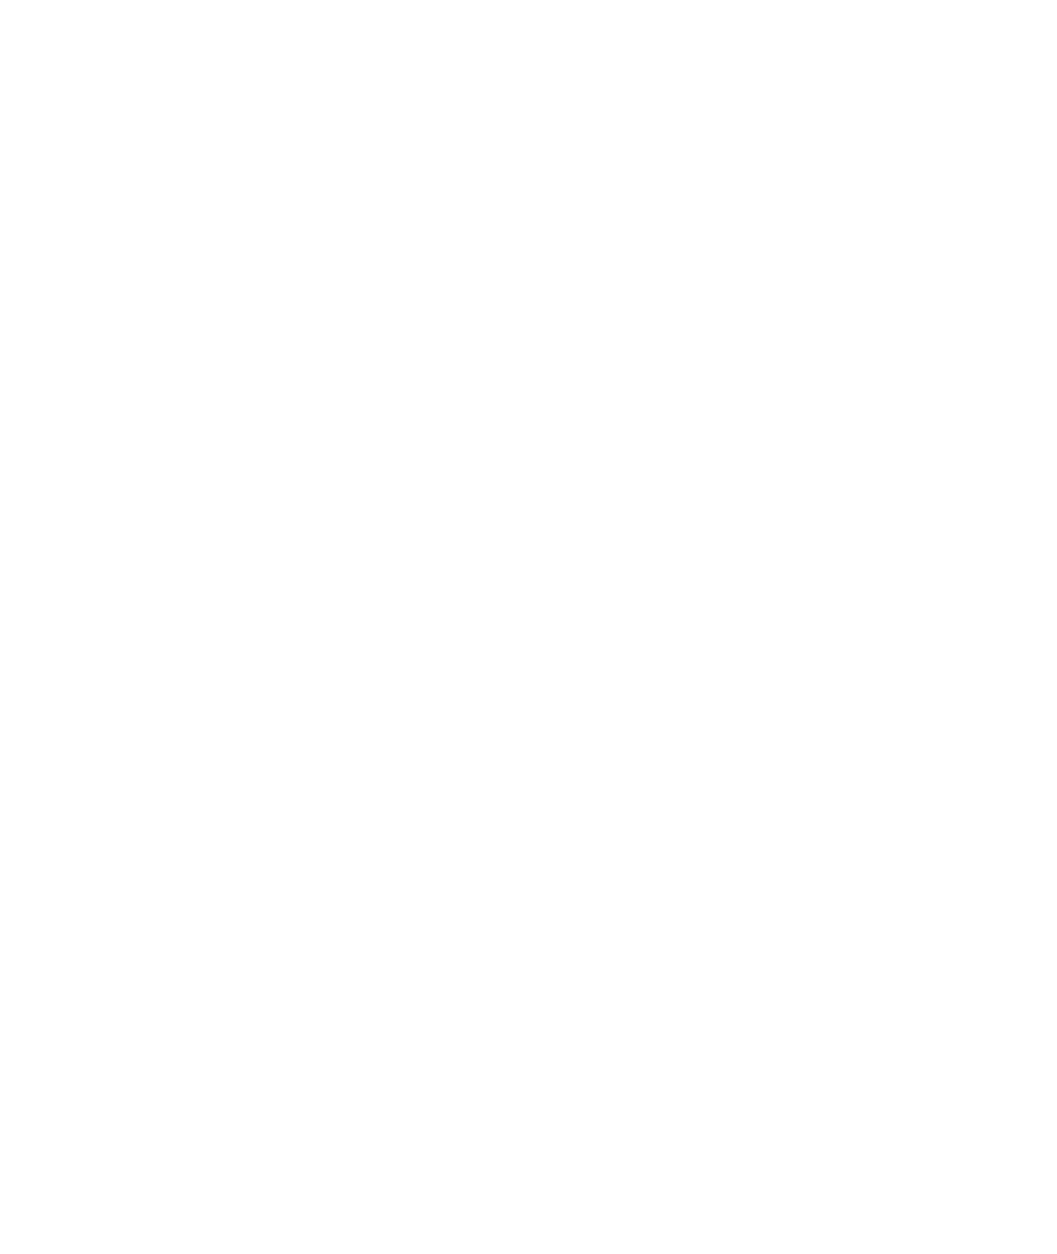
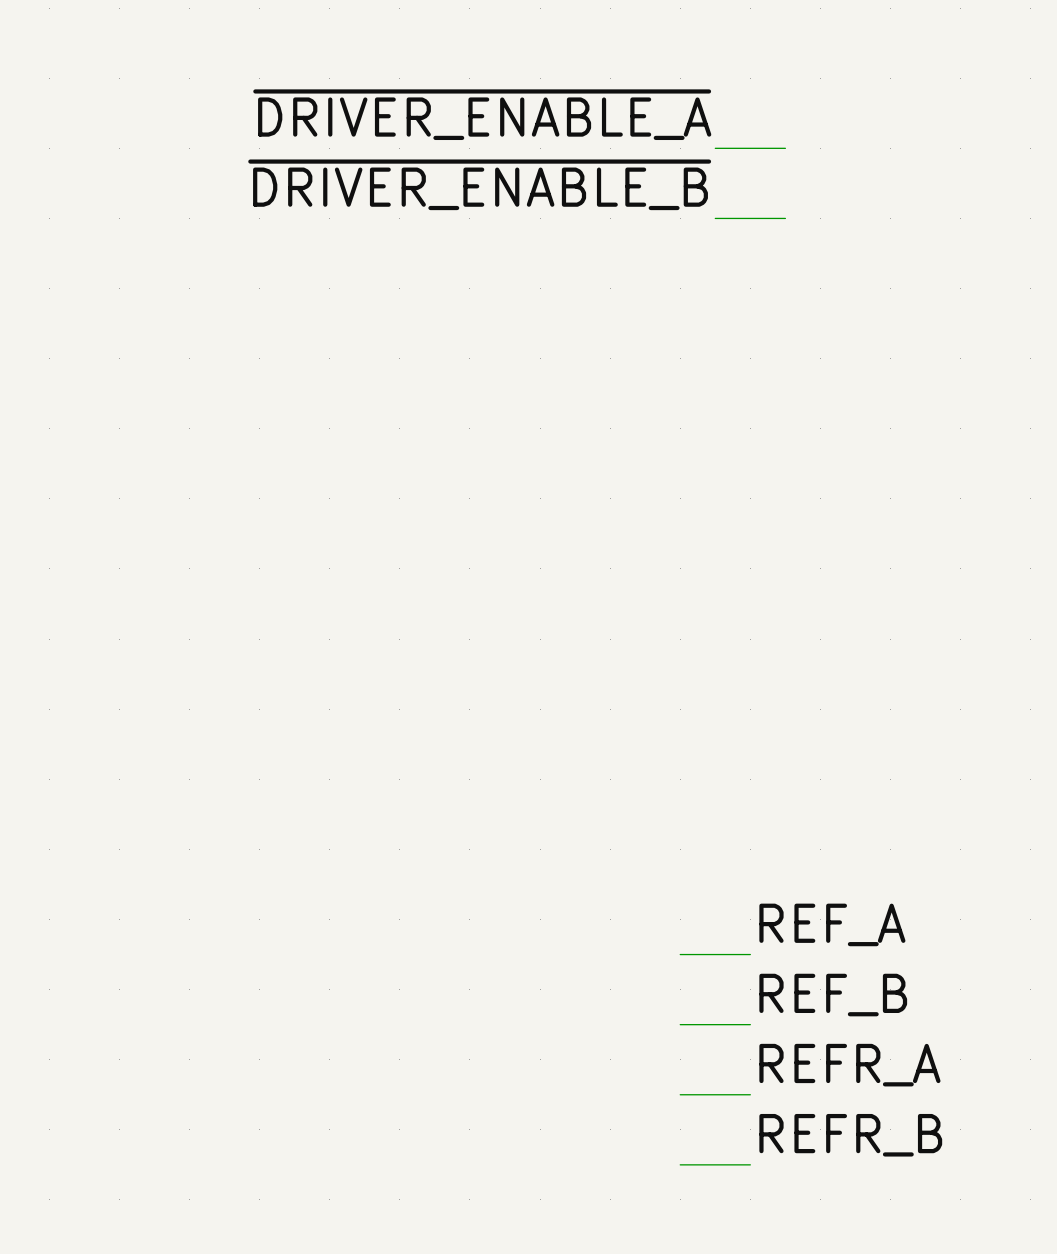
label: none -> ~{DRIVER_ENABLE_A} (482, 114)
wire: none -> (715, 148) (785, 148)
label: none -> ~{DRIVER_ENABLE_B} (479, 184)
wire: none -> (715, 218) (785, 218)
label: none -> REF_A (832, 924)
wire: none -> (680, 954) (750, 954)
label: none -> REF_B (833, 995)
wire: none -> (680, 1024) (750, 1024)
label: none -> REFR_A (849, 1065)
wire: none -> (680, 1094) (750, 1094)
label: none -> REFR_B (850, 1135)
wire: none -> (680, 1164) (750, 1164)

